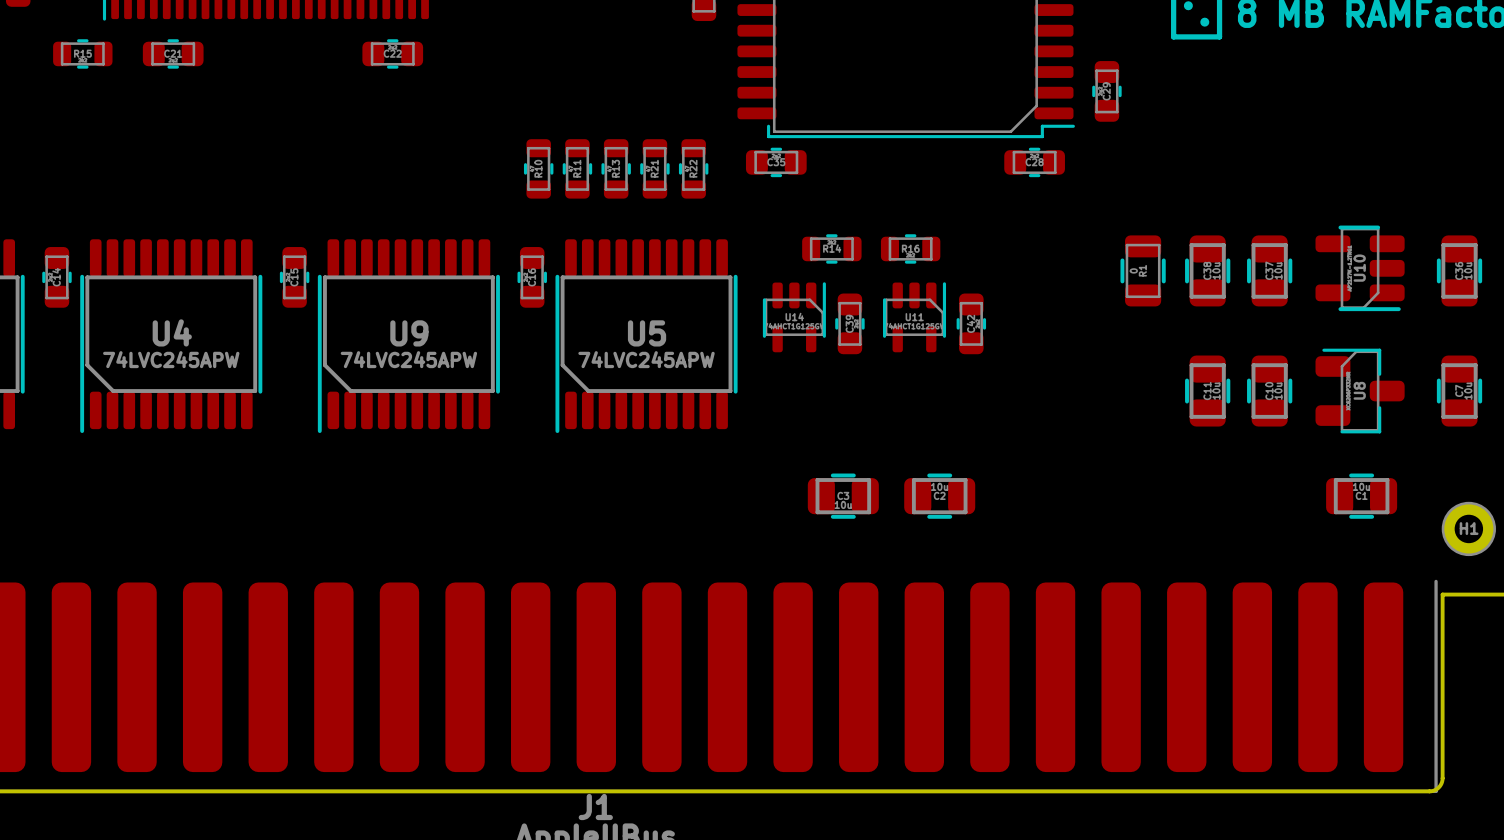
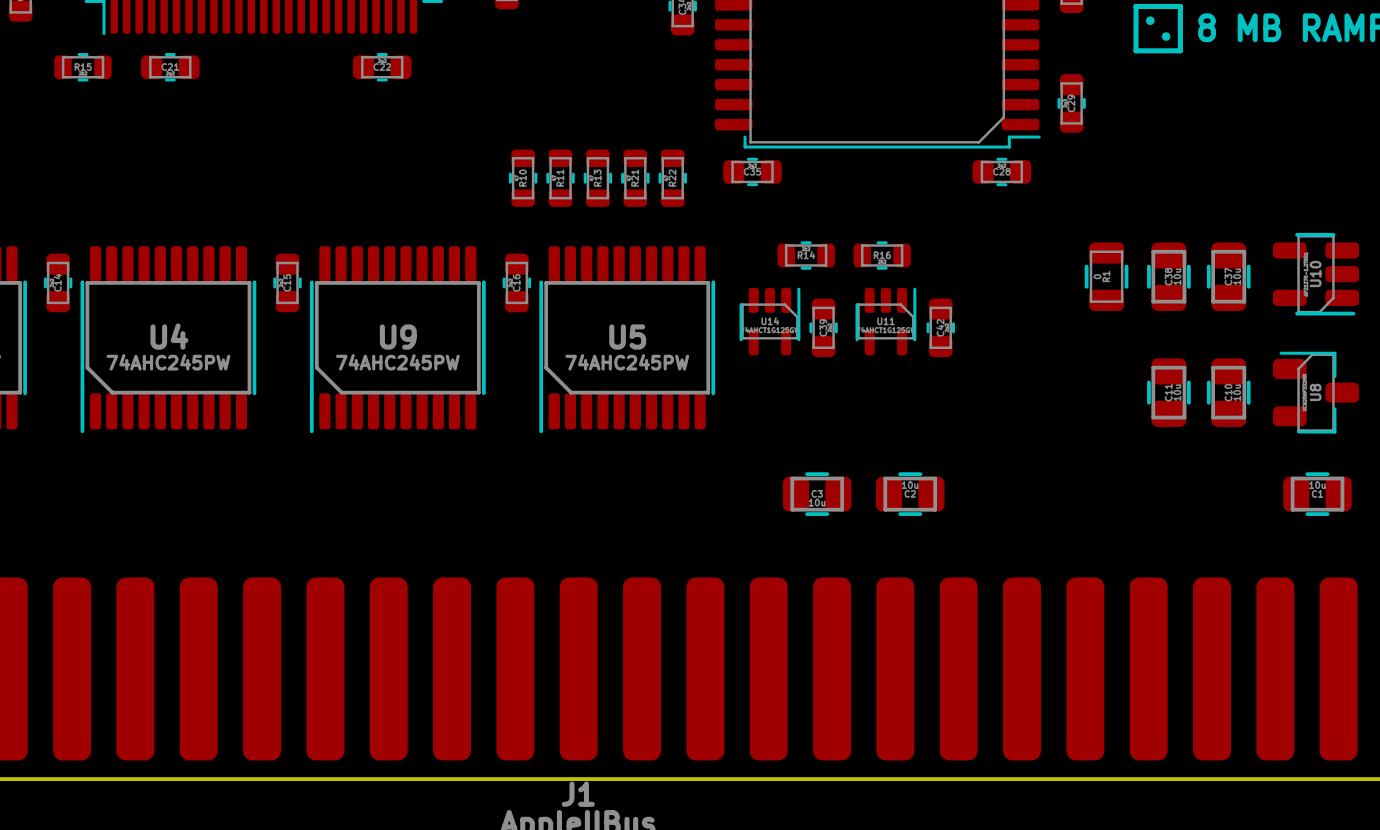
U4 value: 74LVC245APW (171, 359) -> 74AHC245PW (168, 362)
U9 value: 74LVC245APW (408, 359) -> 74AHC245PW (397, 362)
U5 value: 74LVC245APW (646, 359) -> 74AHC245PW (627, 362)

